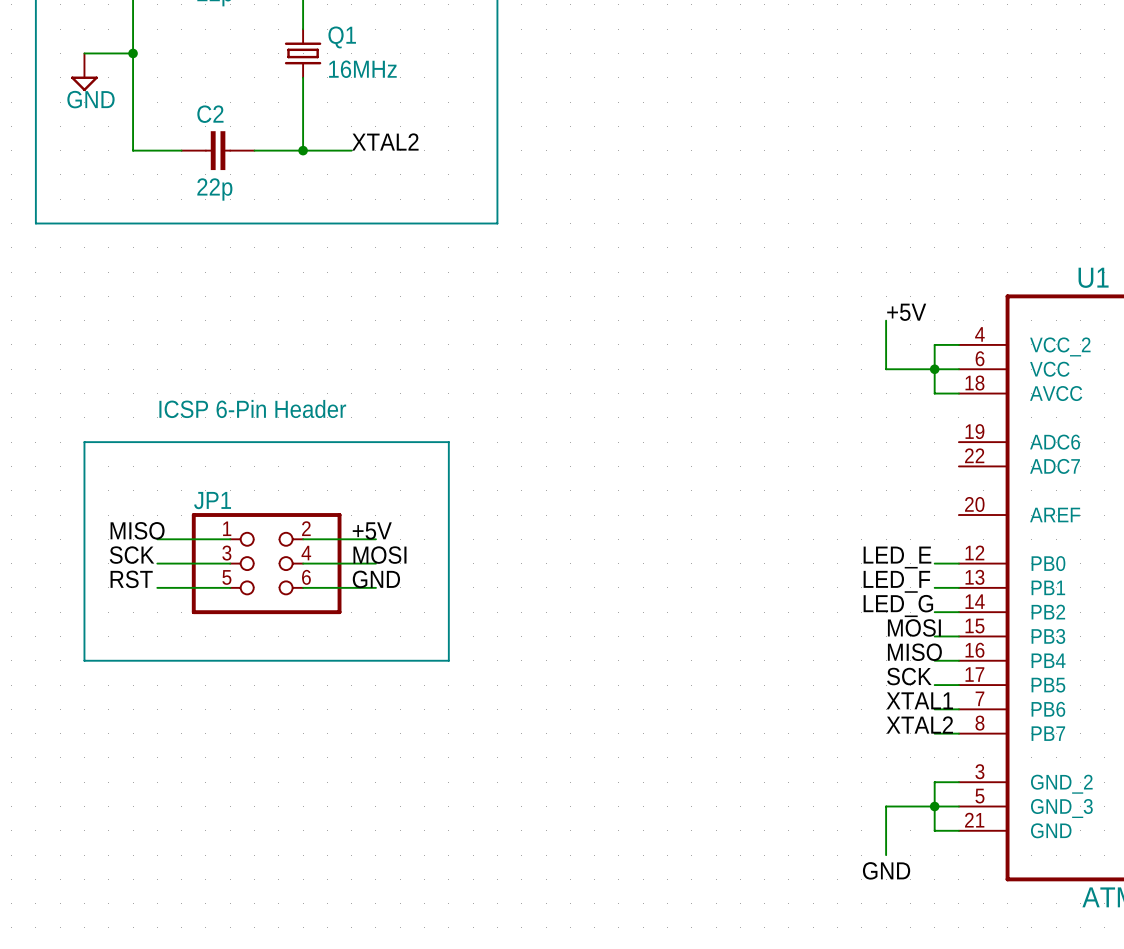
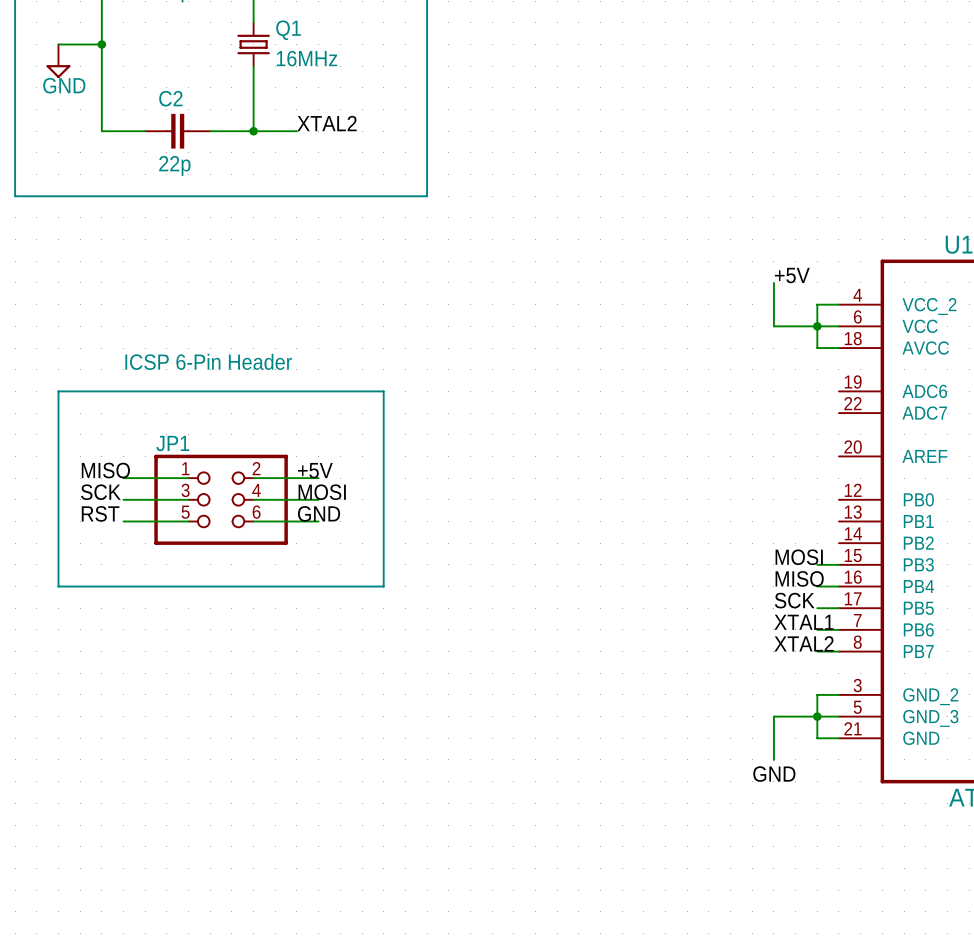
label: LED_E (897, 557) -> none
wire: (934, 563) (958, 563) -> none
label: LED_F (896, 581) -> none
wire: (934, 587) (958, 587) -> none
label: LED_G (898, 605) -> none
wire: (934, 612) (958, 612) -> none

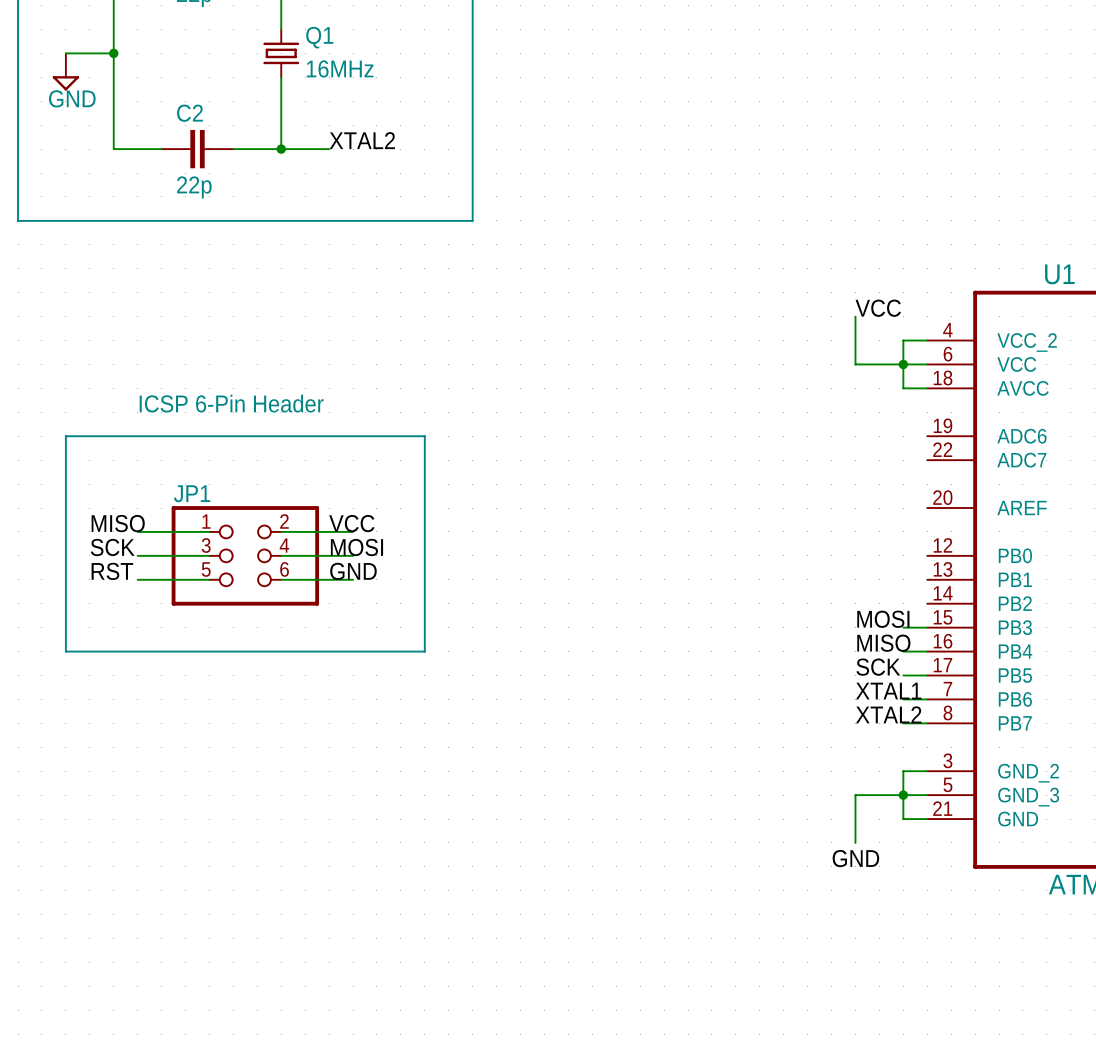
label: +5V (792, 275) -> VCC (878, 308)
label: +5V (315, 470) -> VCC (351, 523)

